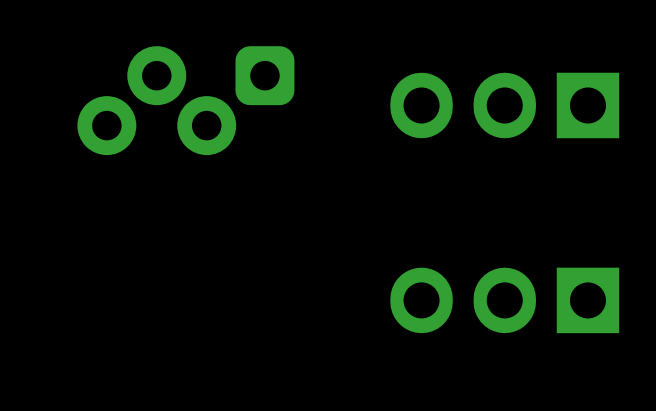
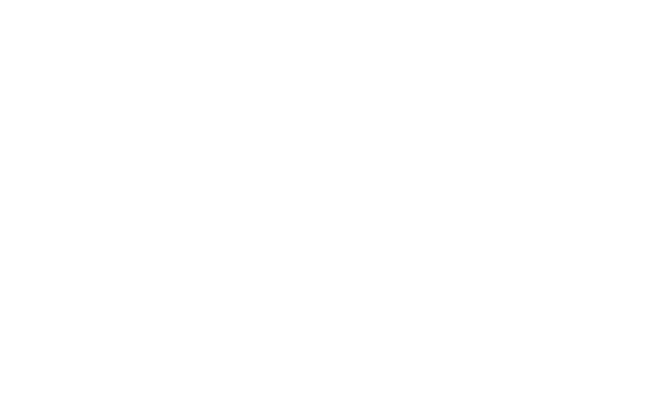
part: (185, 100) -> none
part: (504, 105) -> none
part: (504, 300) -> none

